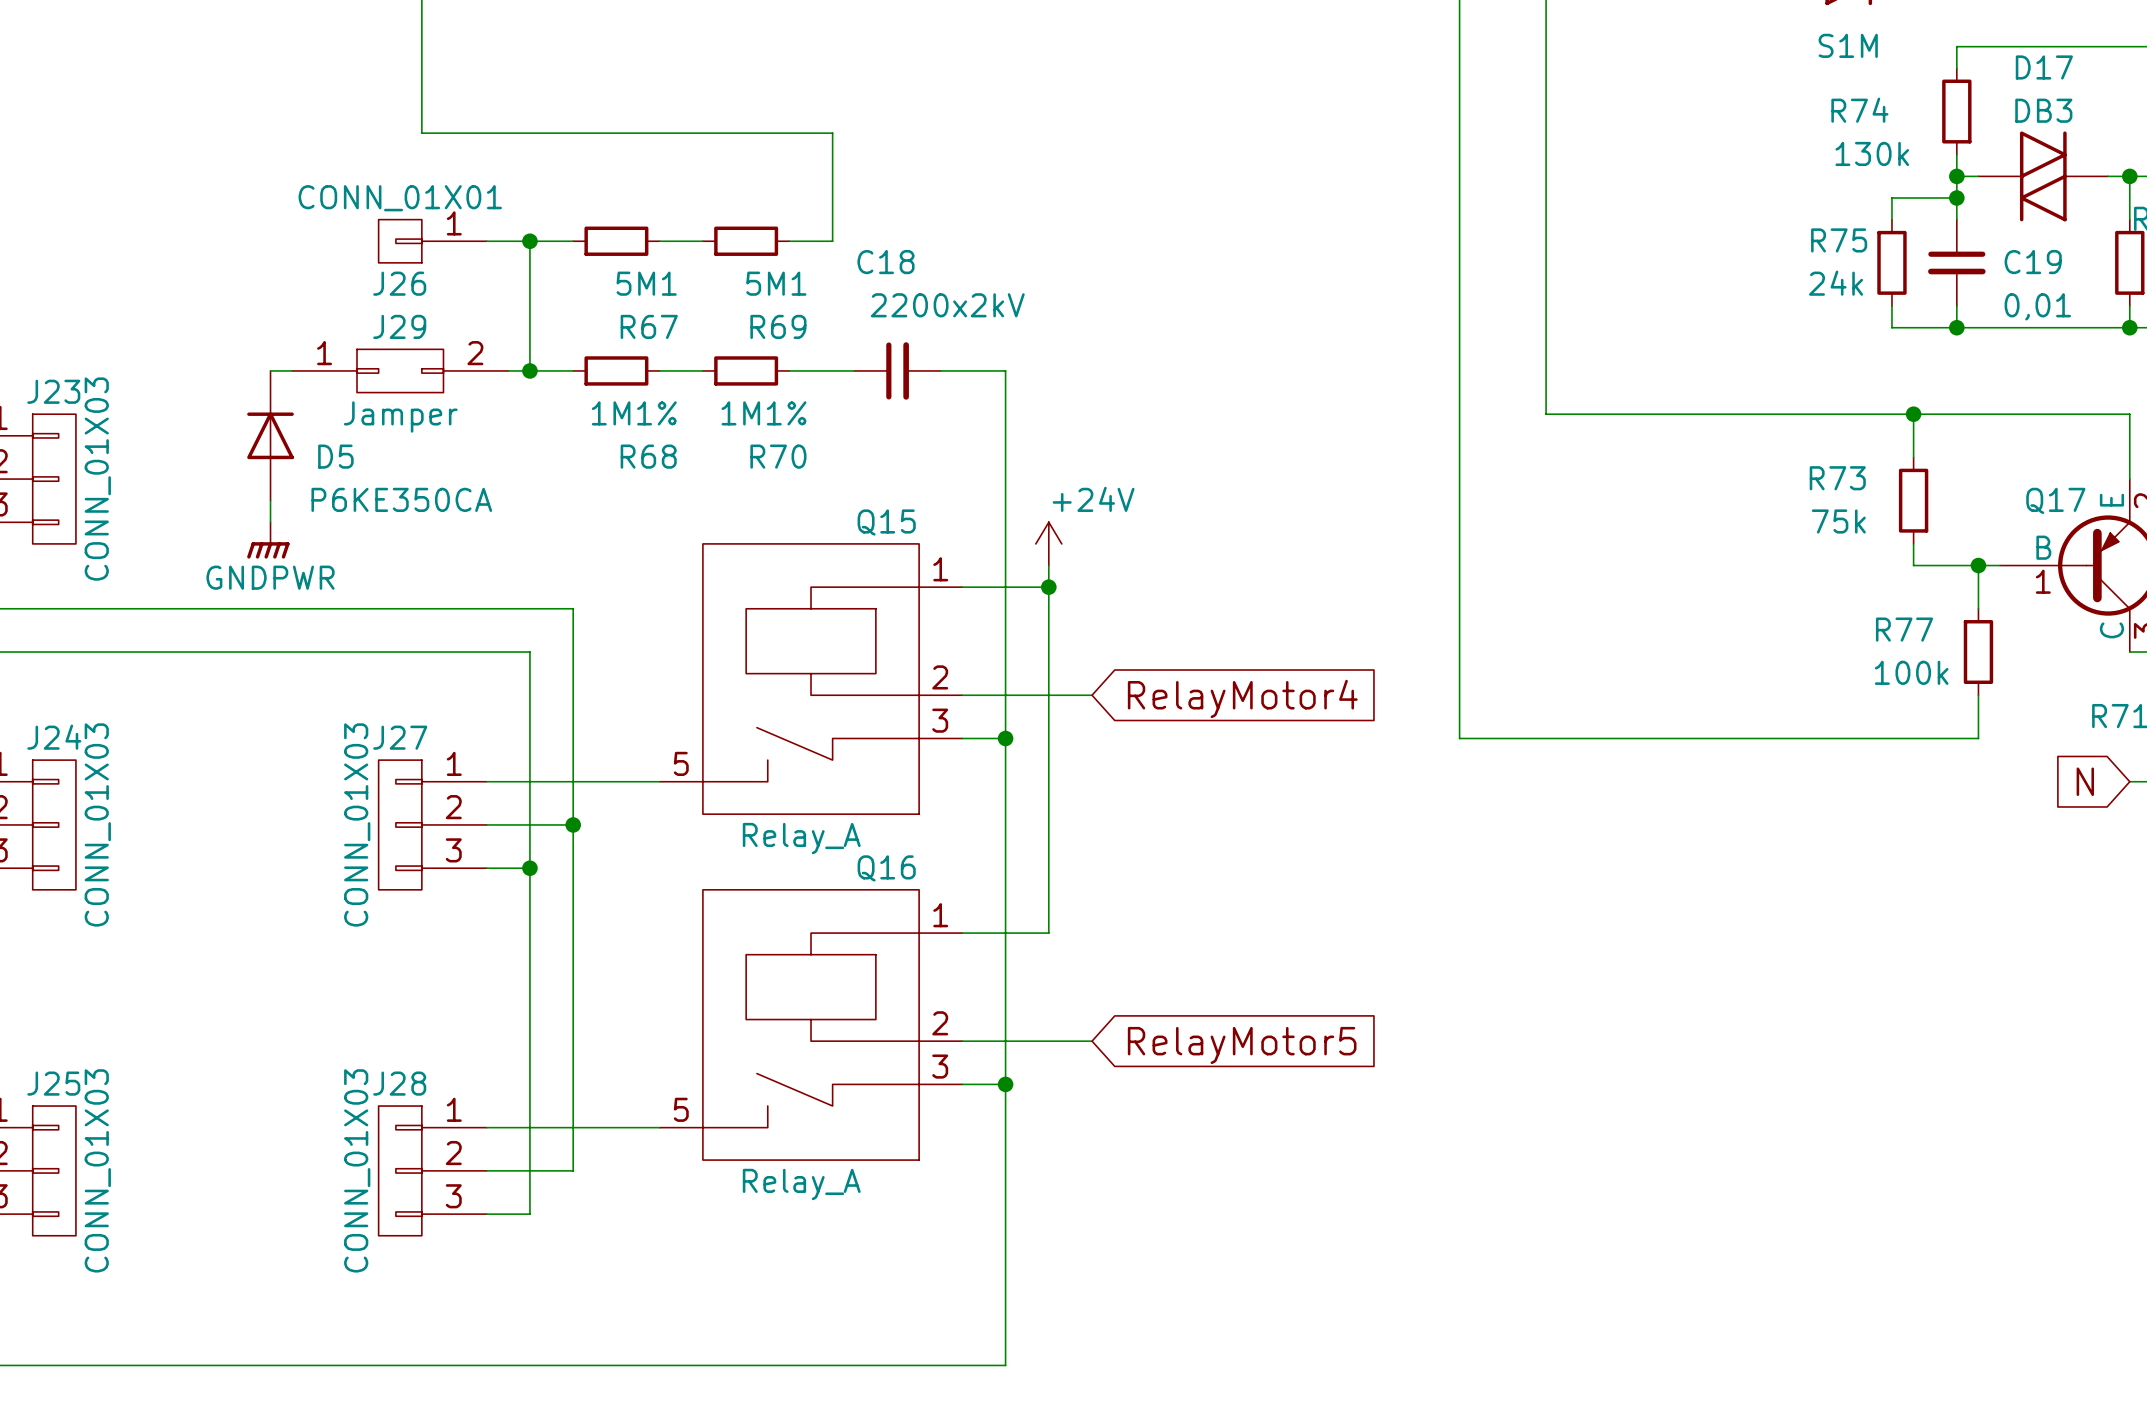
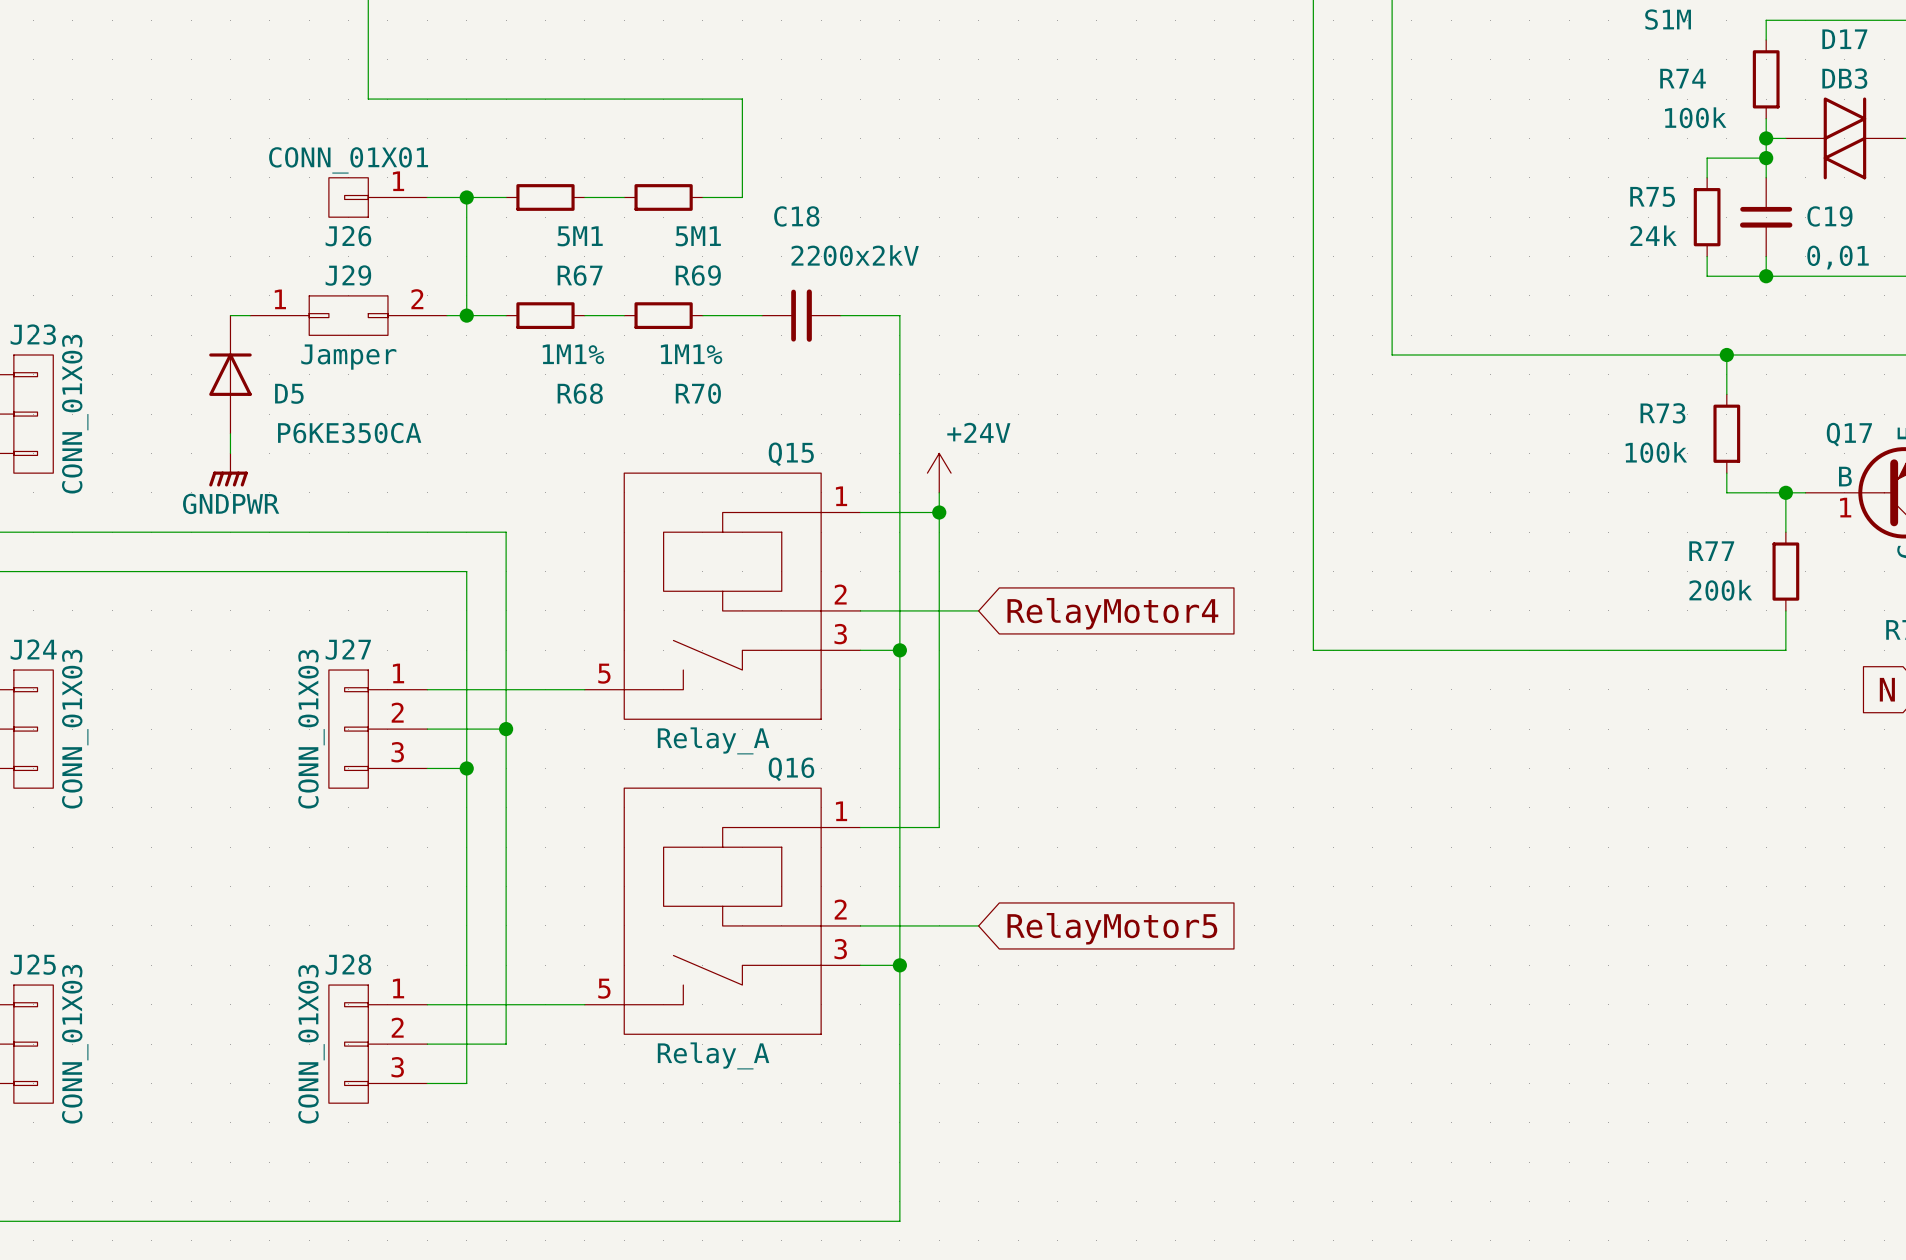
R74 value: 130k (1872, 153) -> 100k (1695, 117)
R73 value: 75k (1838, 521) -> 100k (1656, 452)
R77 value: 100k (1911, 672) -> 200k (1720, 590)

